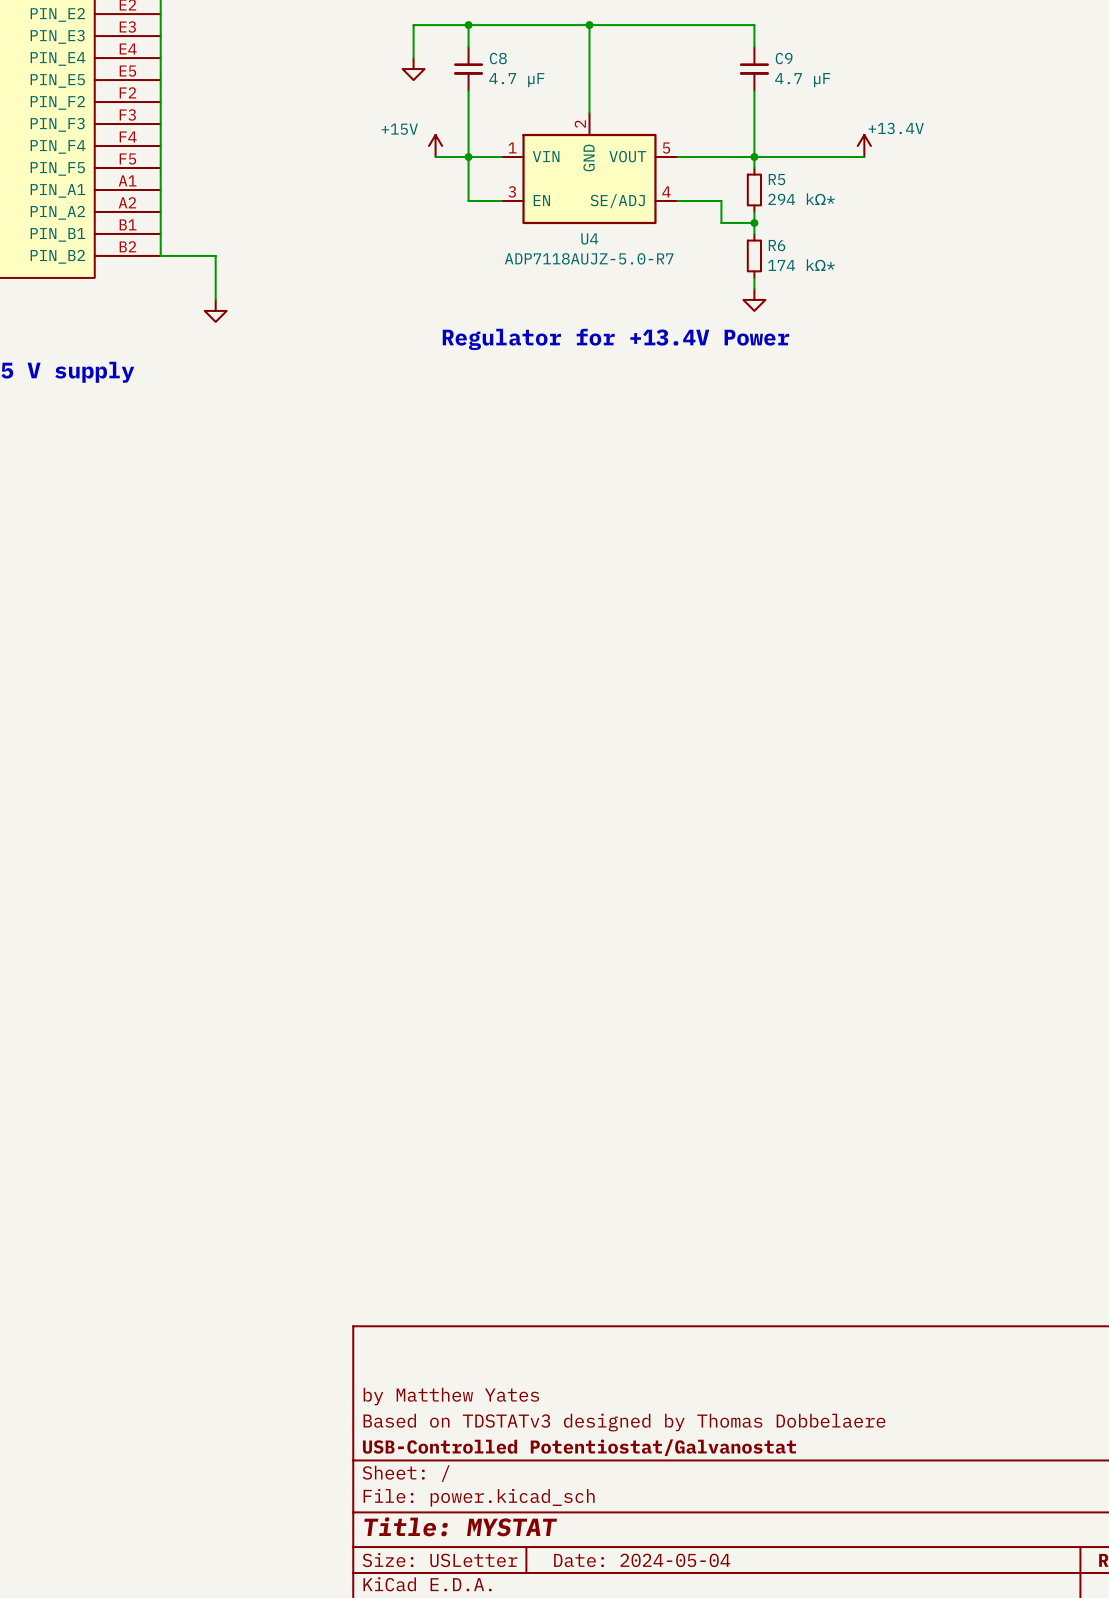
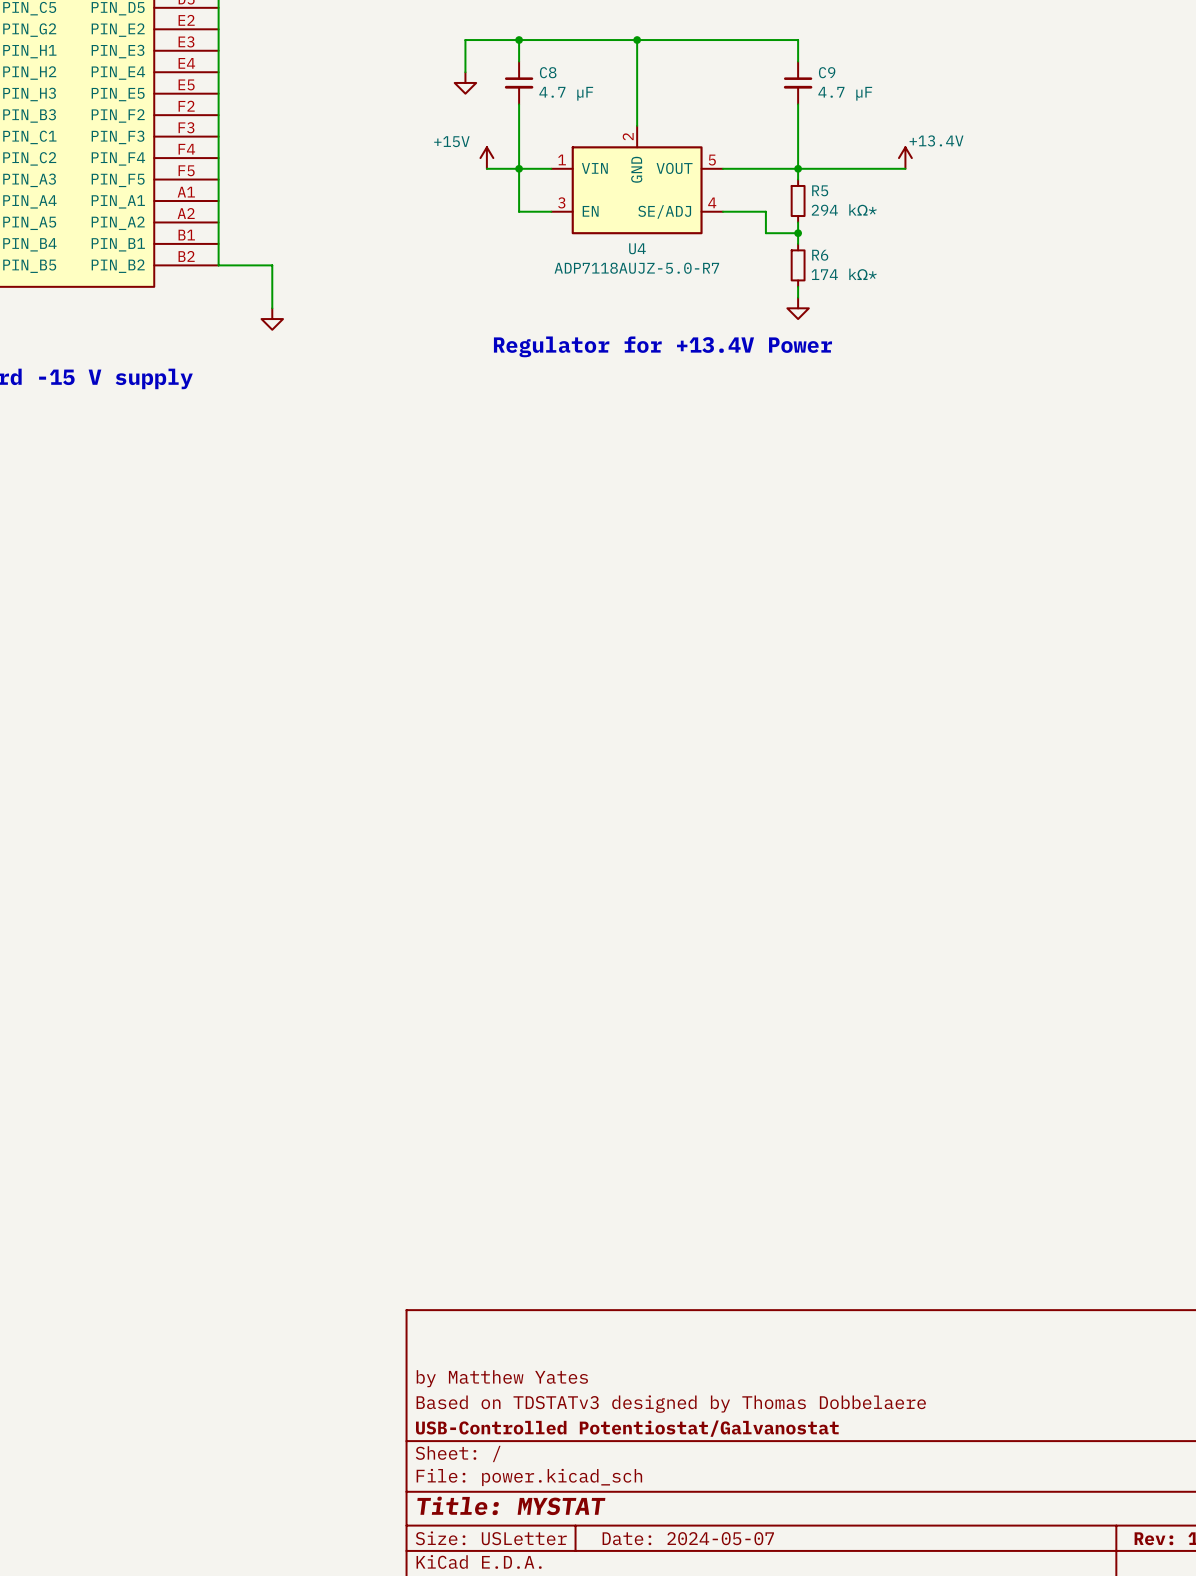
title block: Date: 2024-05-04 (642, 1560) -> Date: 2024-05-07 (688, 1538)

